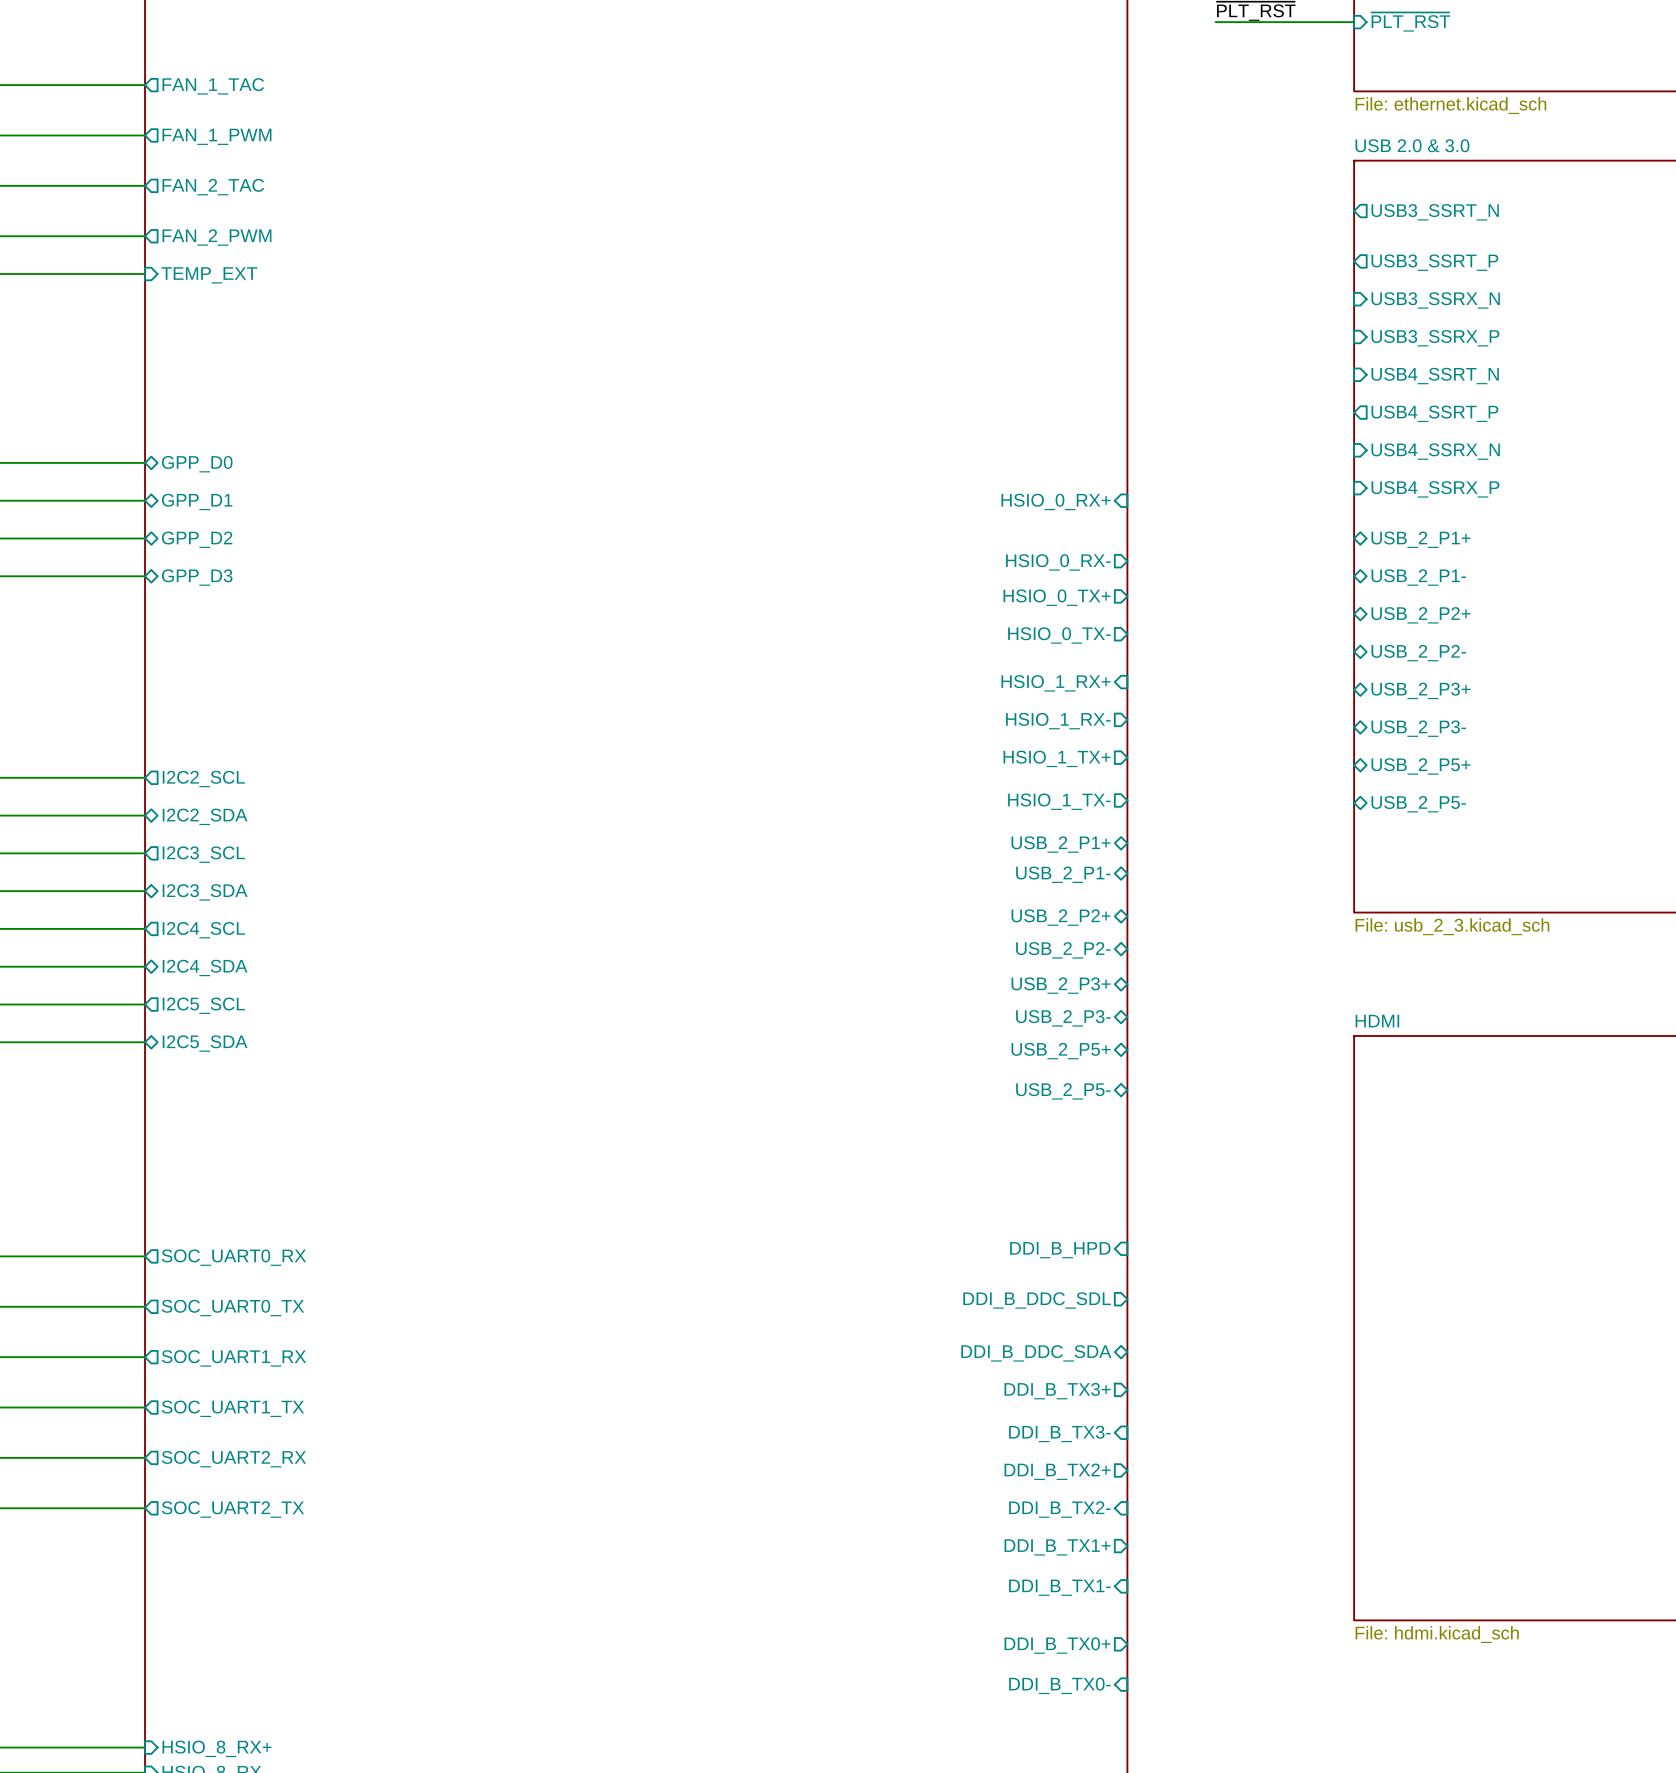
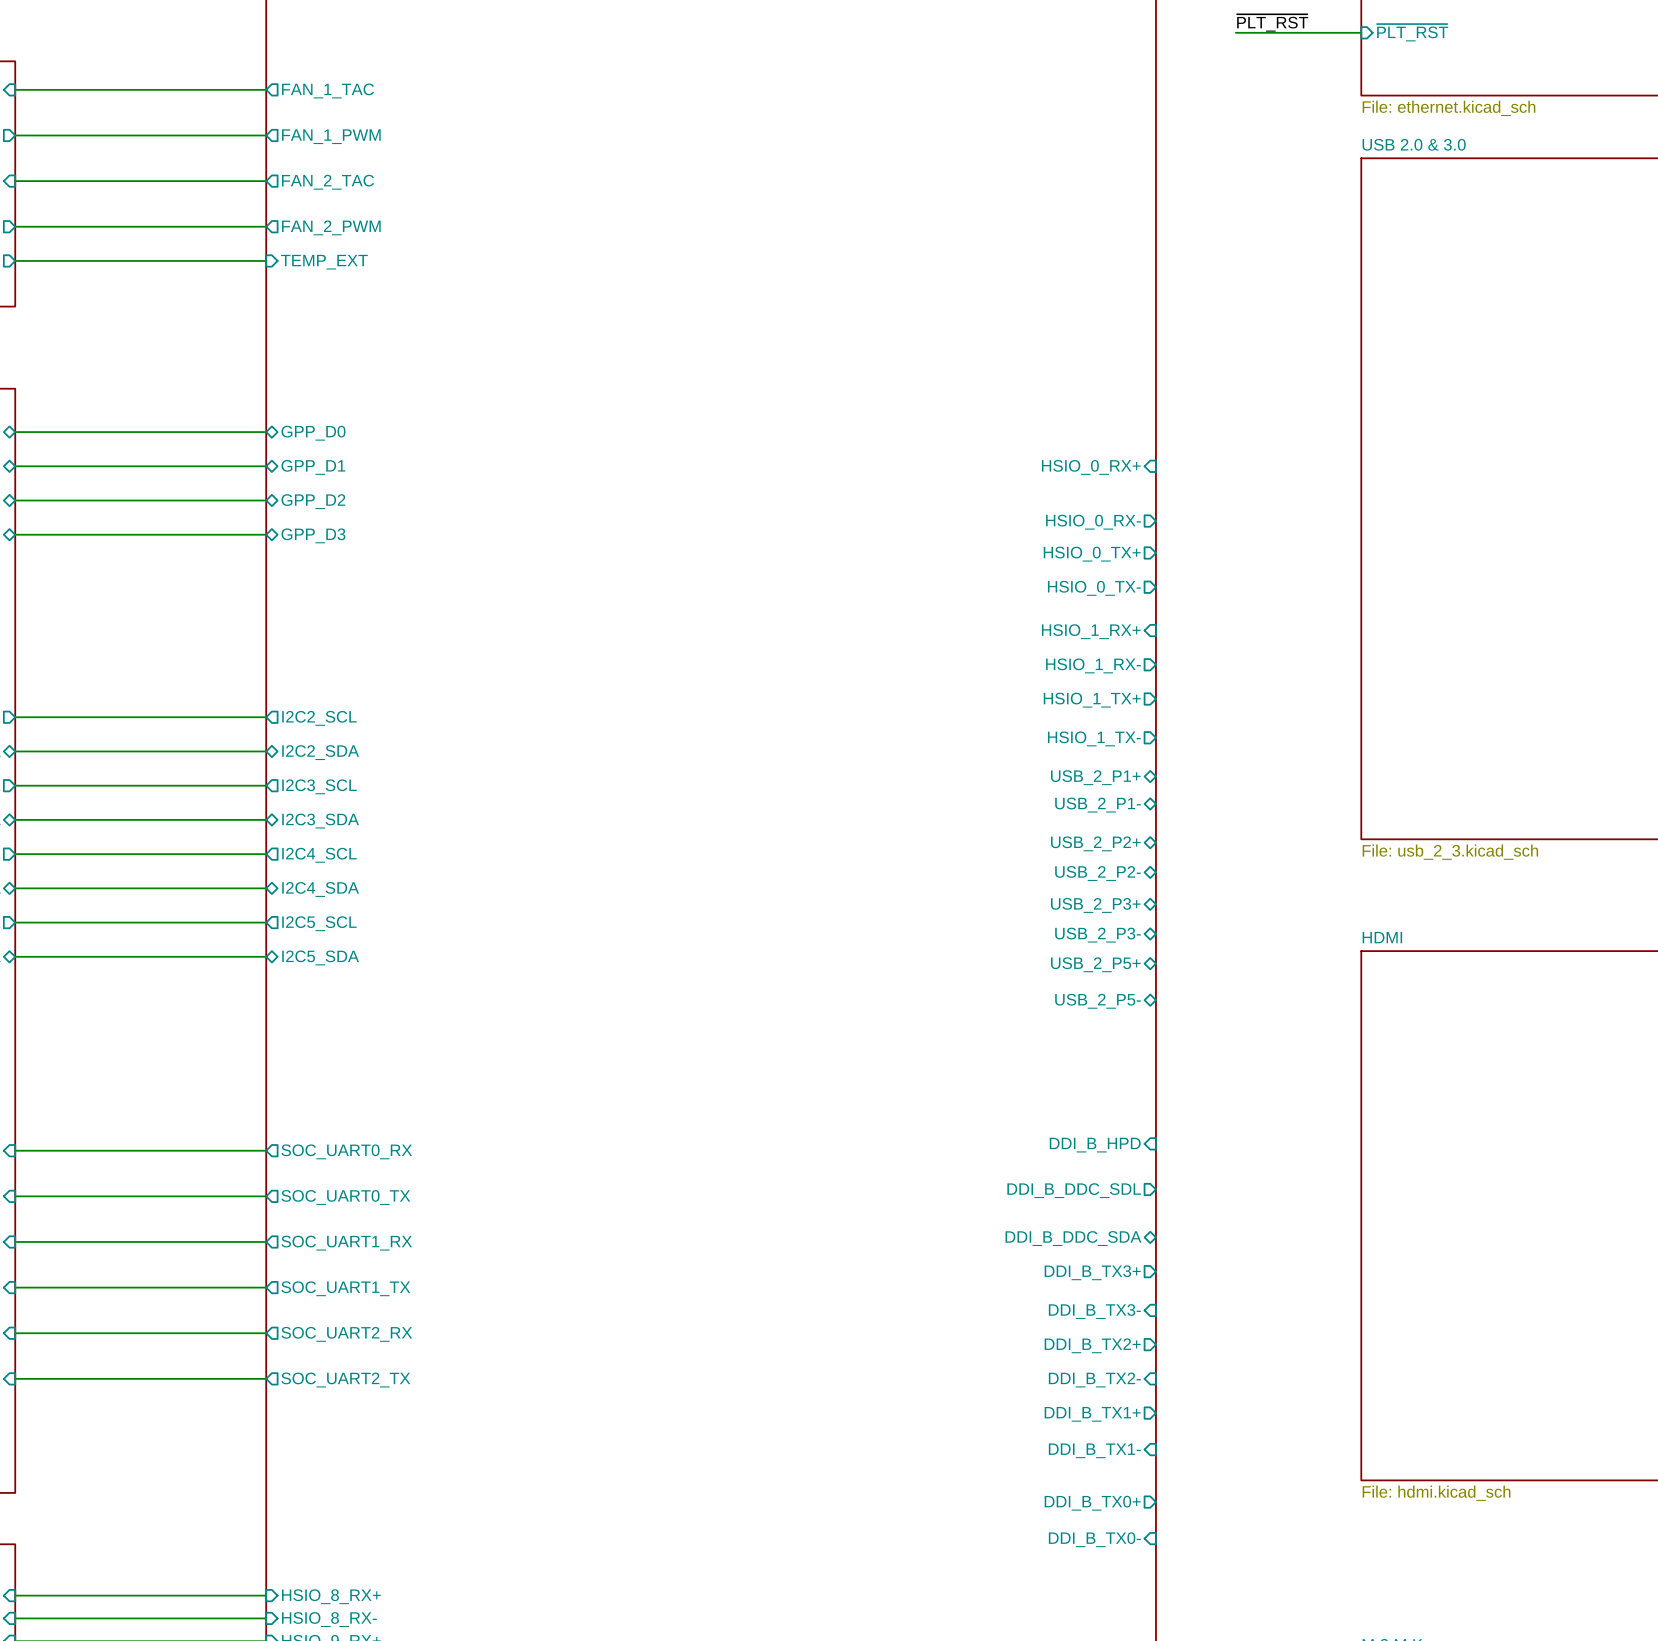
sheet pin: USB3_SSRT_N (1435, 212) -> none
sheet pin: USB3_SSRT_P (1434, 262) -> none
sheet pin: USB3_SSRX_N (1435, 300) -> none
sheet pin: USB3_SSRX_P (1435, 338) -> none
sheet pin: USB4_SSRT_N (1435, 376) -> none
sheet pin: USB4_SSRT_P (1434, 413) -> none
sheet pin: USB4_SSRX_N (1435, 451) -> none
sheet pin: USB4_SSRX_P (1435, 489) -> none
sheet pin: USB_2_P1+ (1420, 539) -> none
sheet pin: USB_2_P1- (1418, 577) -> none
sheet pin: USB_2_P2+ (1420, 615) -> none
sheet pin: USB_2_P2- (1418, 653) -> none
sheet pin: USB_2_P3+ (1420, 690) -> none
sheet pin: USB_2_P3- (1418, 728) -> none
sheet pin: USB_2_P5+ (1420, 766) -> none
sheet pin: USB_2_P5- (1418, 804) -> none

